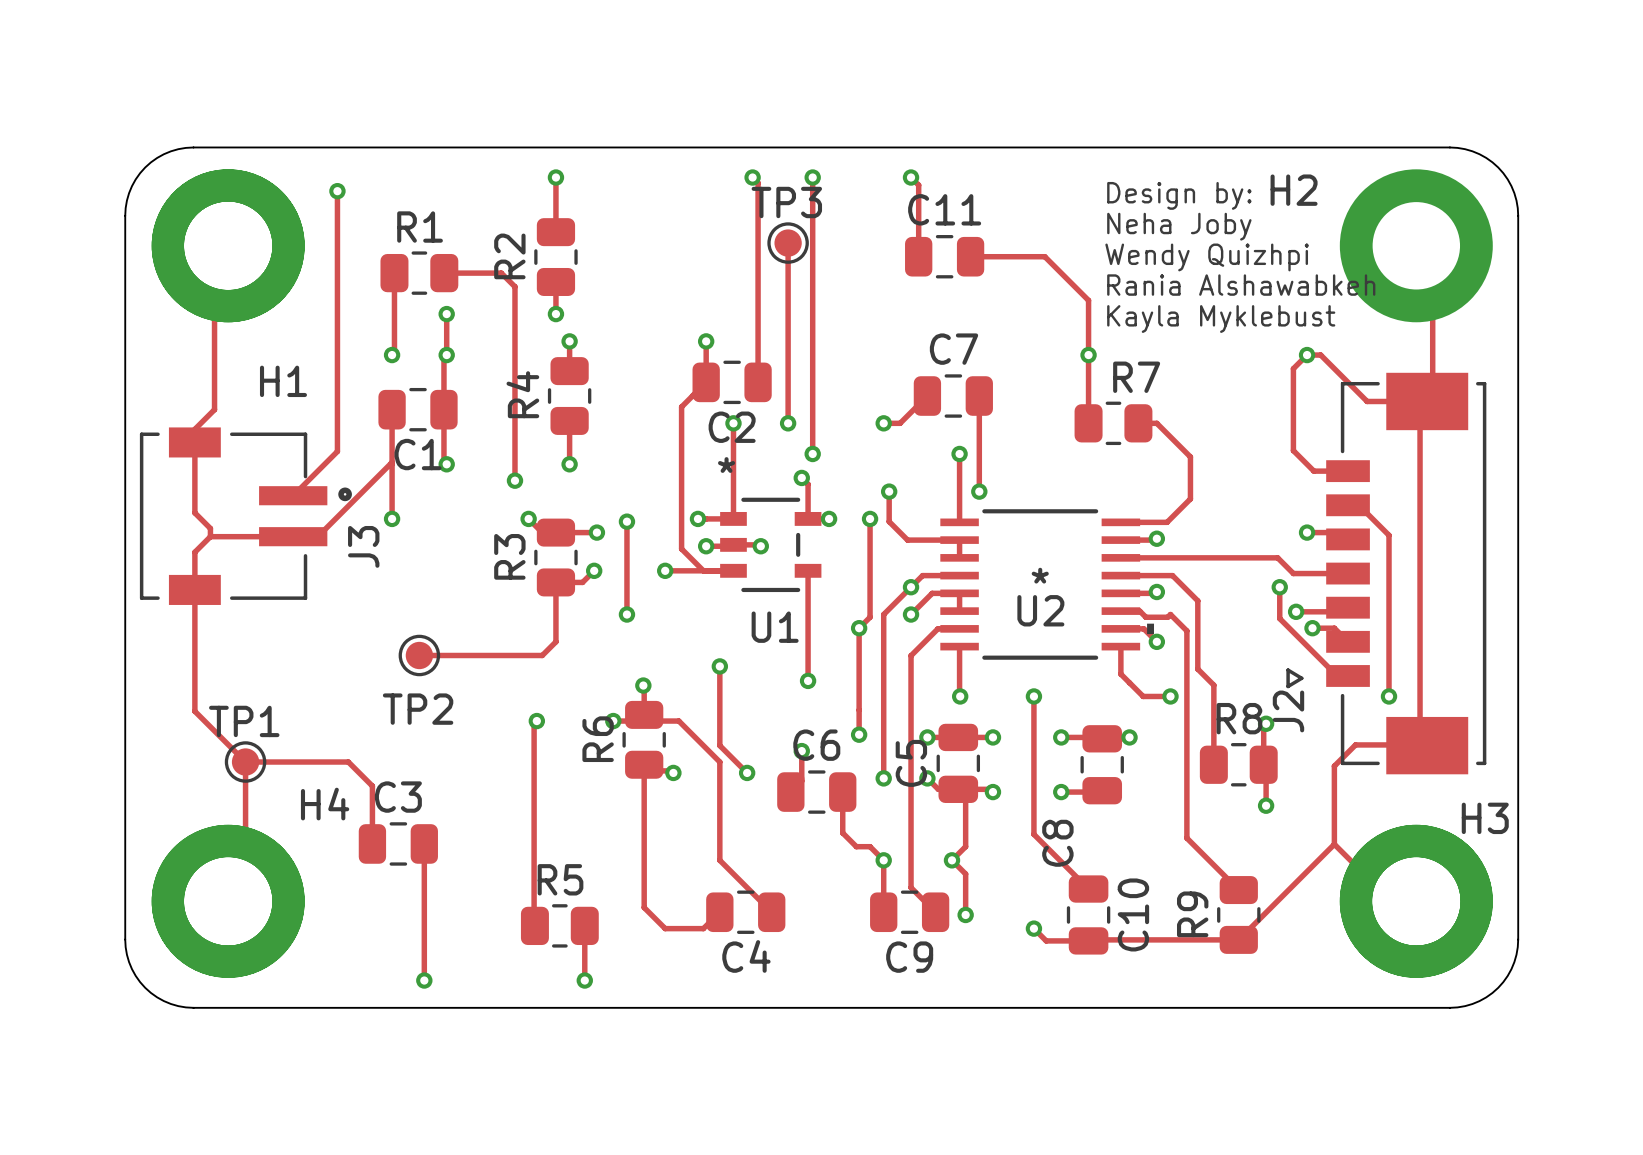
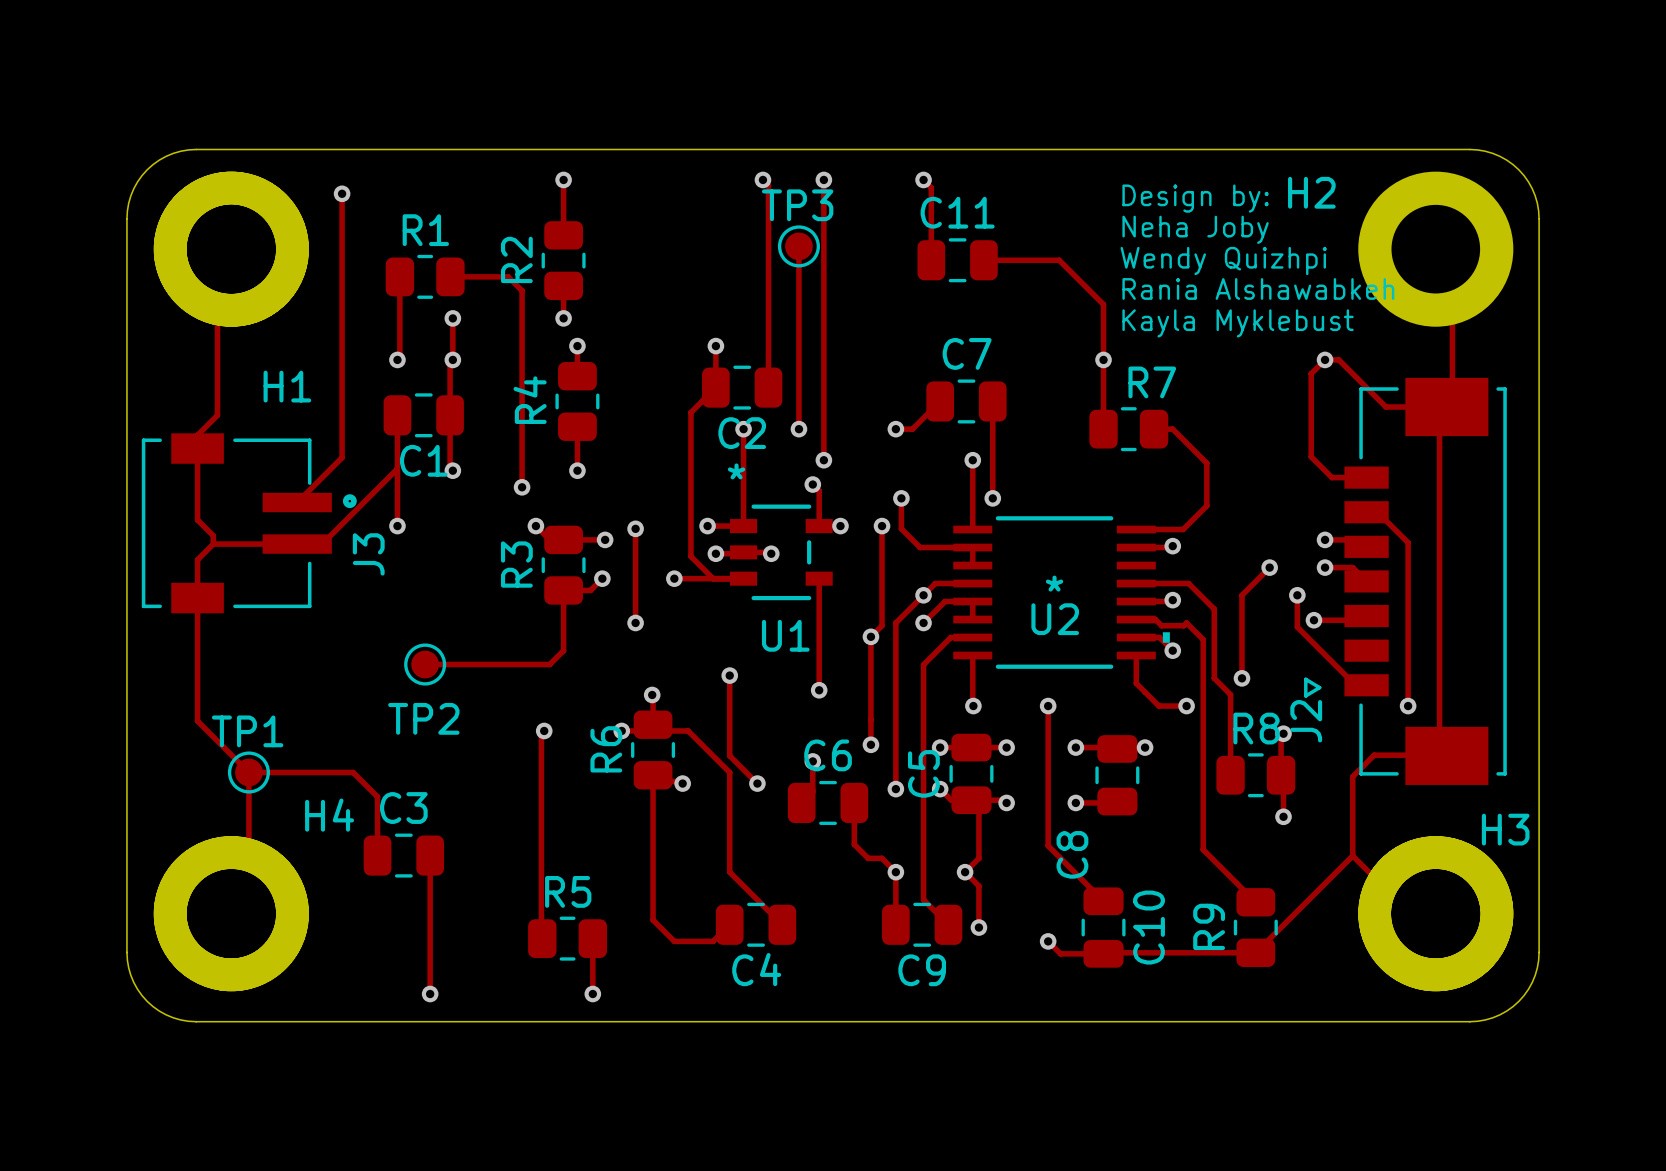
track: (1120, 557) (1277, 557) (1293, 573) (1348, 573) -> (1325, 567) (1352, 567) (1366, 581)
track: none -> (1269, 567) (1241, 595) (1241, 678)
via: none -> (1269, 567)
via: none -> (1325, 567)
track: (1312, 628) (1334, 628) (1348, 641) -> none
via: (1312, 628) -> none
via: none -> (1241, 678)

